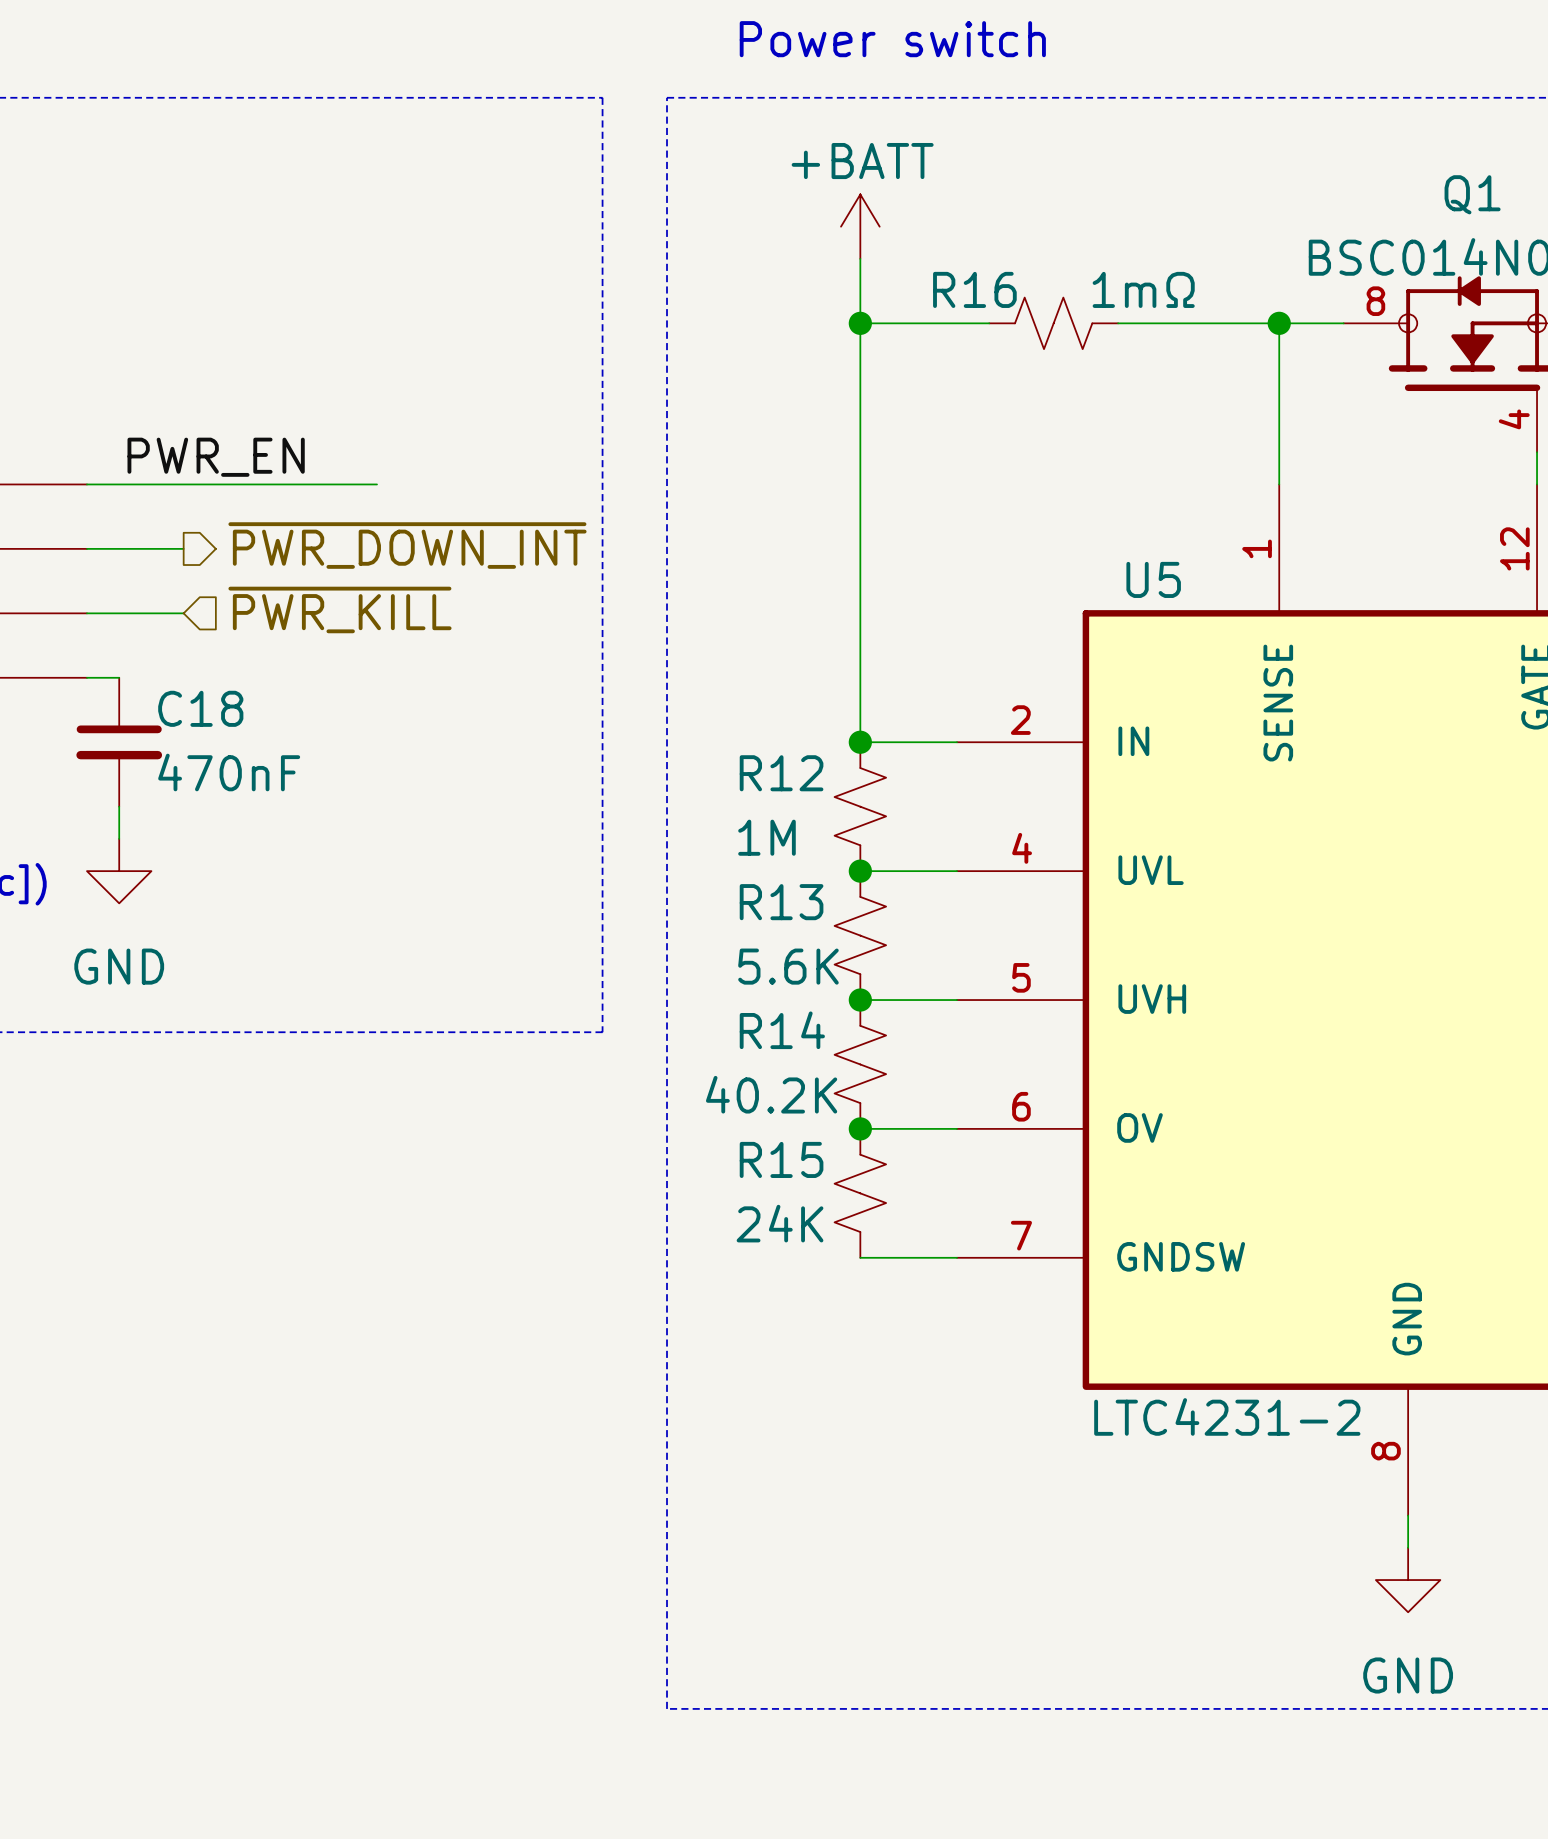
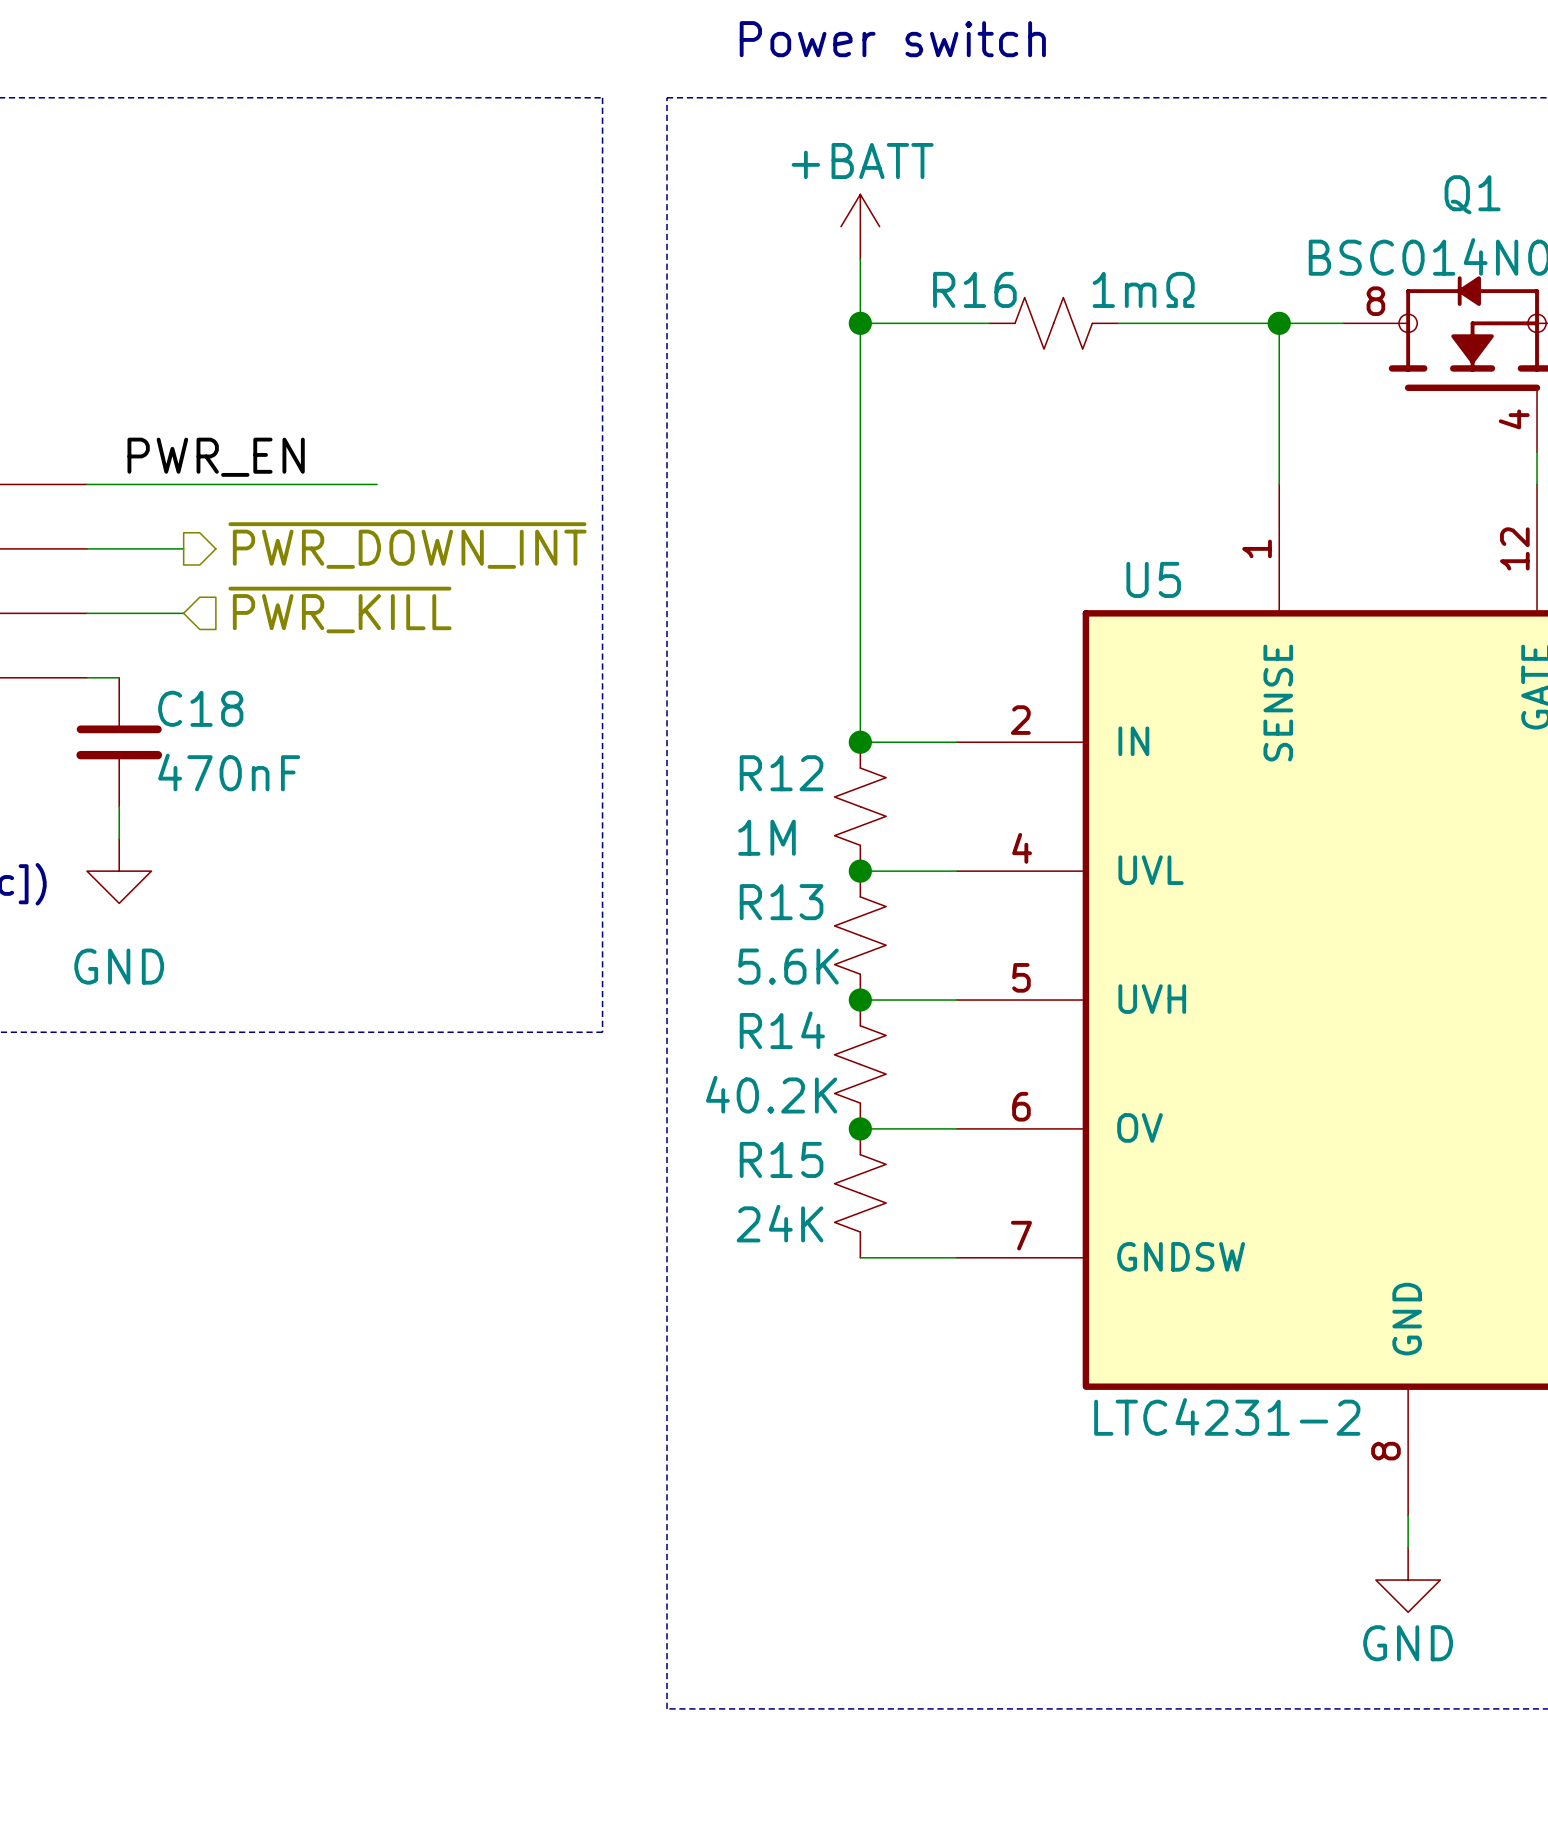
power symbol text position: GND (1408, 1675) -> GND (1408, 1643)

